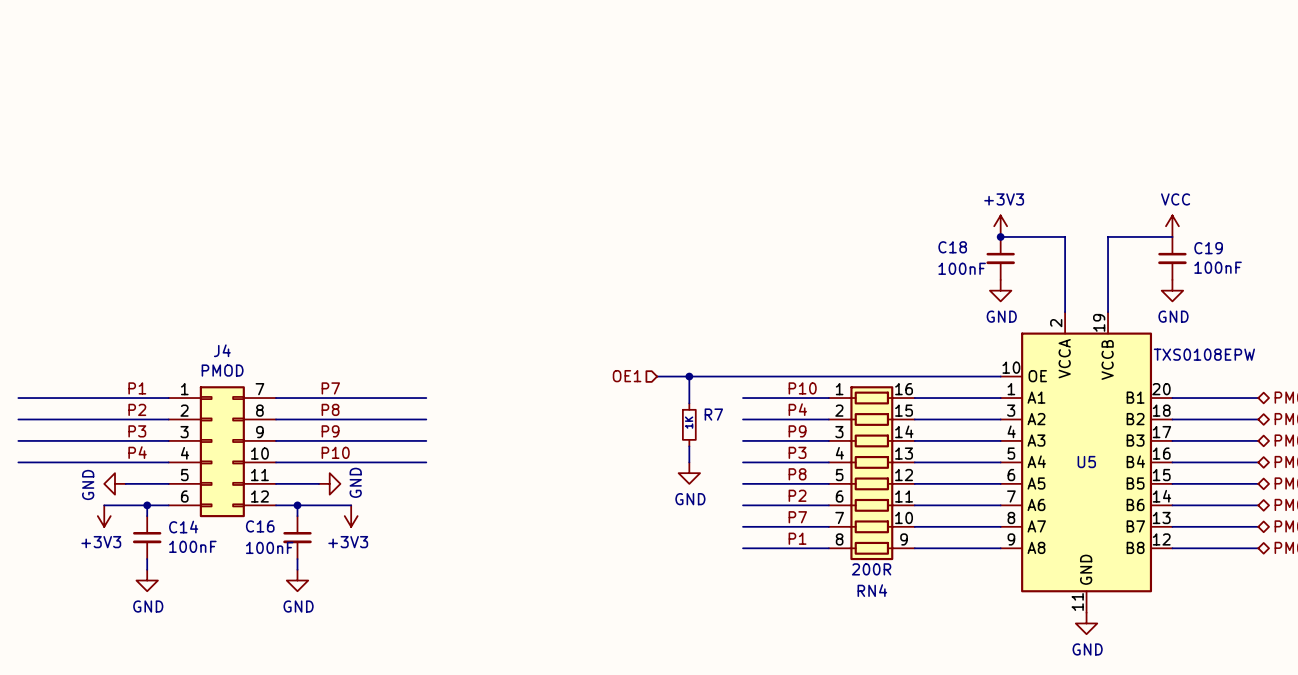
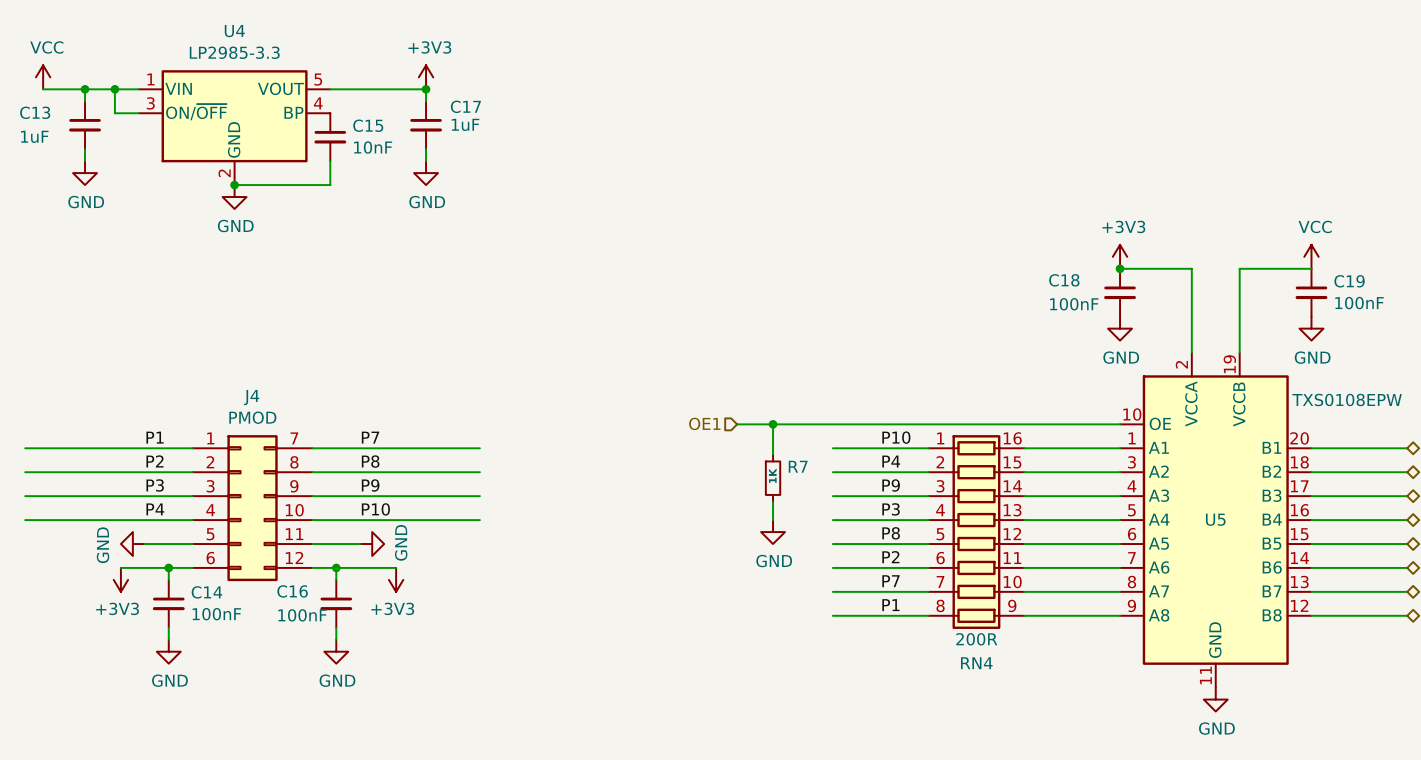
power symbol: none -> VCC (43, 77)
power symbol: none -> +3V3 (426, 77)
wire: none -> (43, 89) (138, 89)
wire: none -> (85, 89) (85, 101)
junction: none -> (85, 89)
wire: none -> (114, 89) (114, 113) (138, 113)
junction: none -> (114, 89)
wire: none -> (330, 89) (426, 89) (426, 101)
junction: none -> (426, 89)
C13: none -> 1uF (85, 125)
C17: none -> 1uF (426, 125)
U4: none -> LP2985-3.3 (234, 127)
C15: none -> 10nF (330, 137)
wire: none -> (85, 149) (85, 161)
wire: none -> (426, 149) (426, 161)
wire: none -> (330, 161) (330, 185) (234, 185)
power symbol: none -> GND (85, 173)
power symbol: none -> GND (426, 173)
junction: none -> (234, 185)
power symbol: none -> GND (234, 197)

